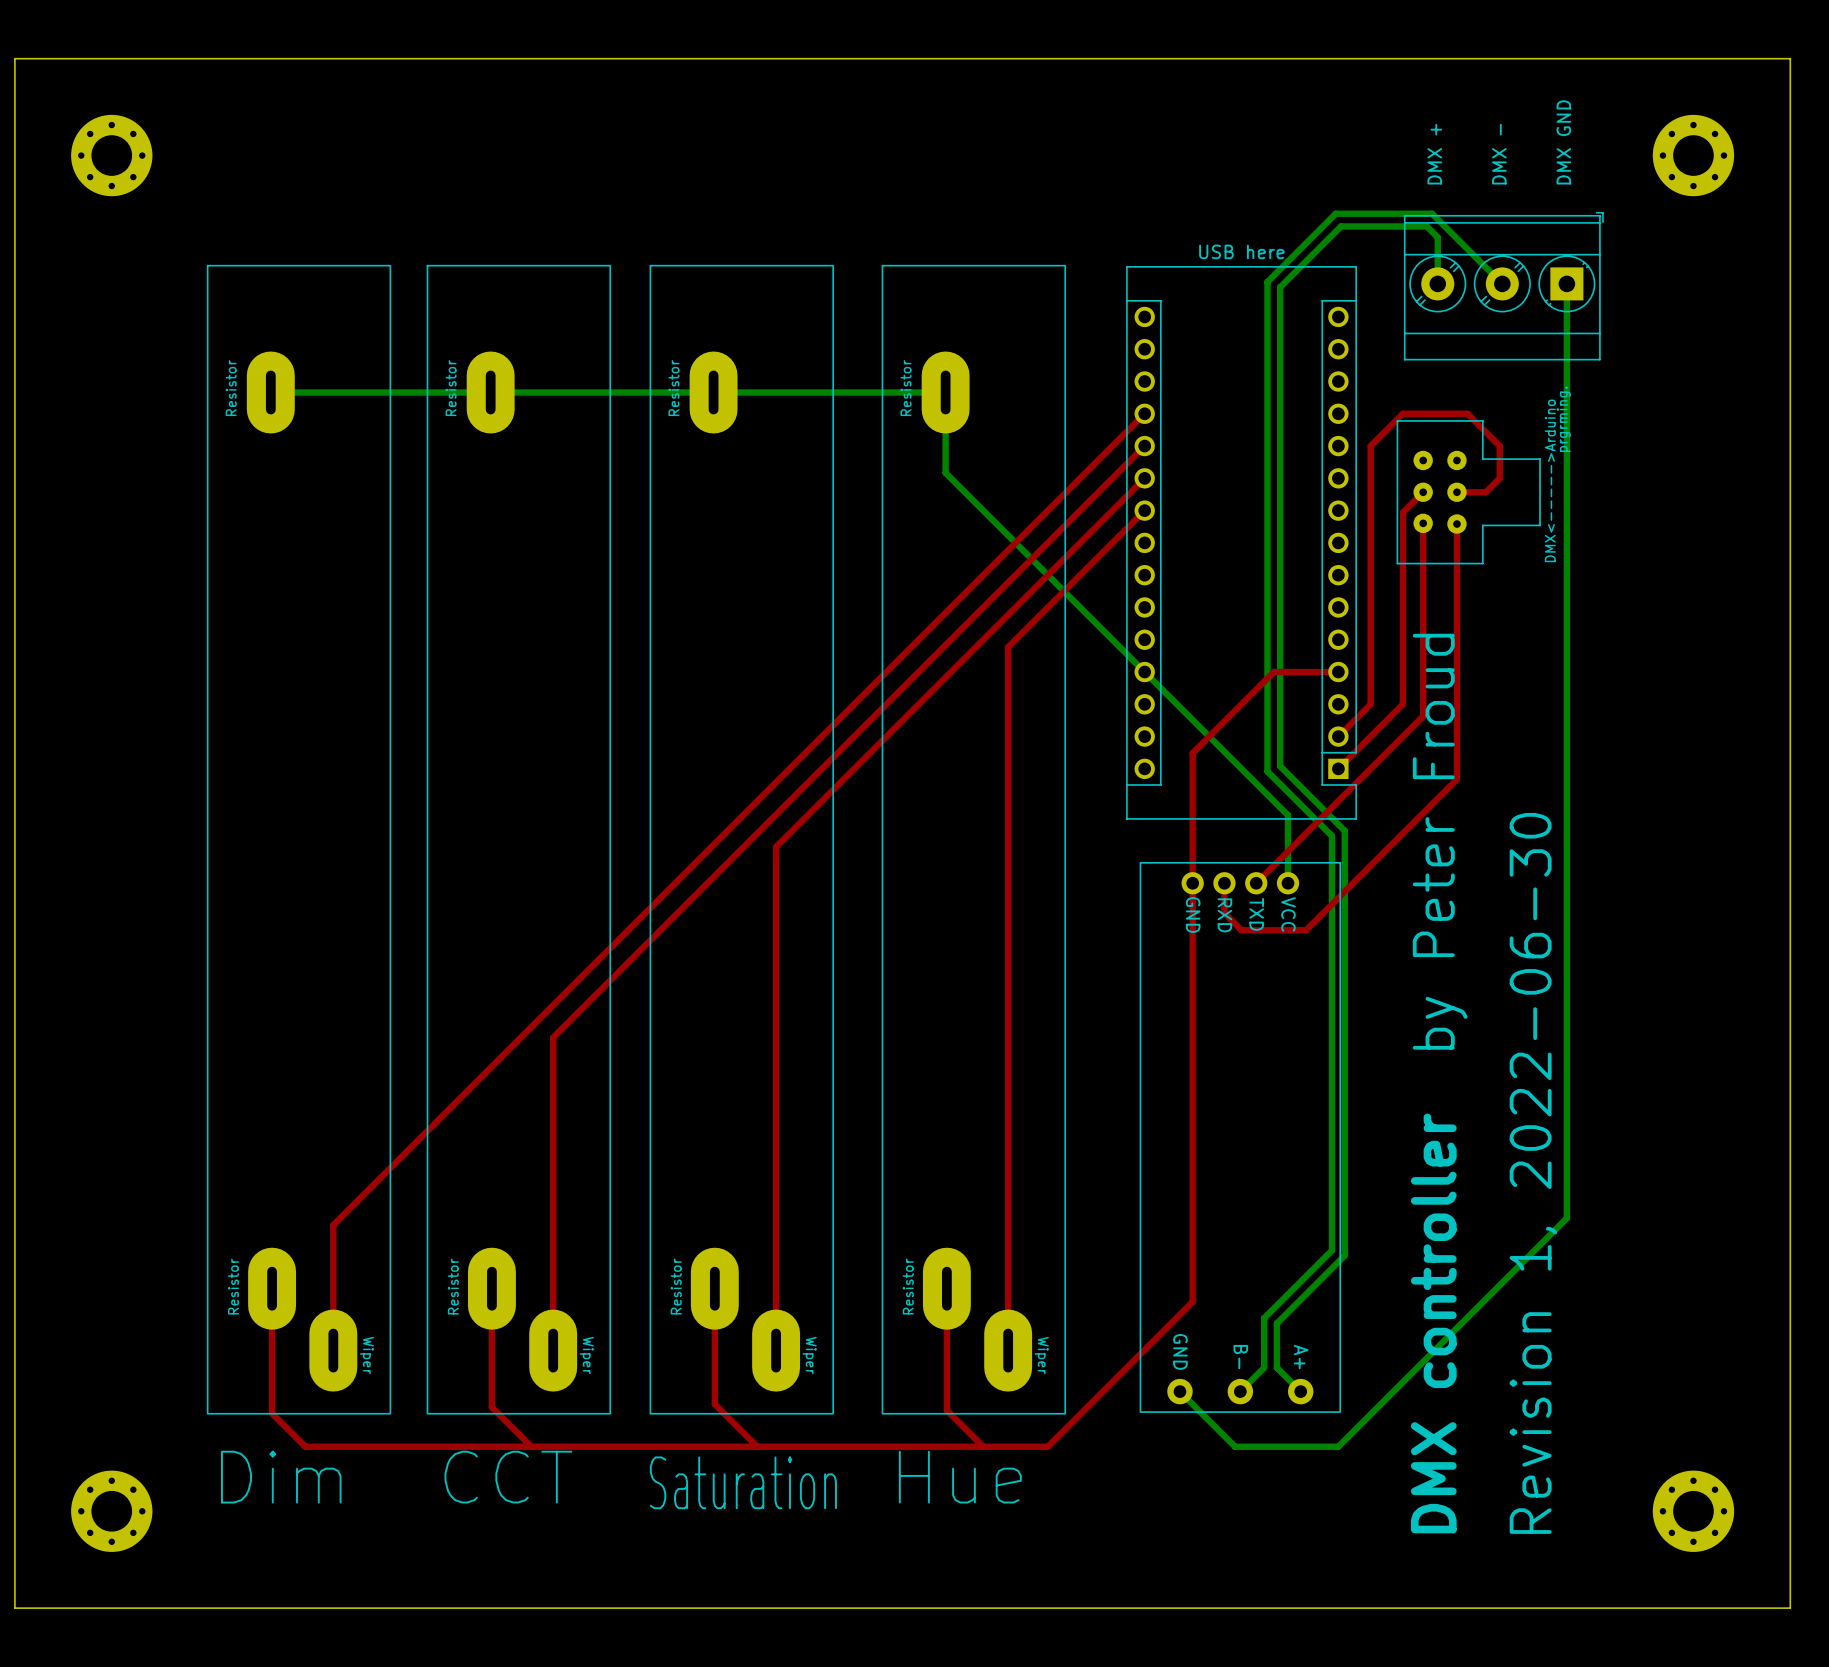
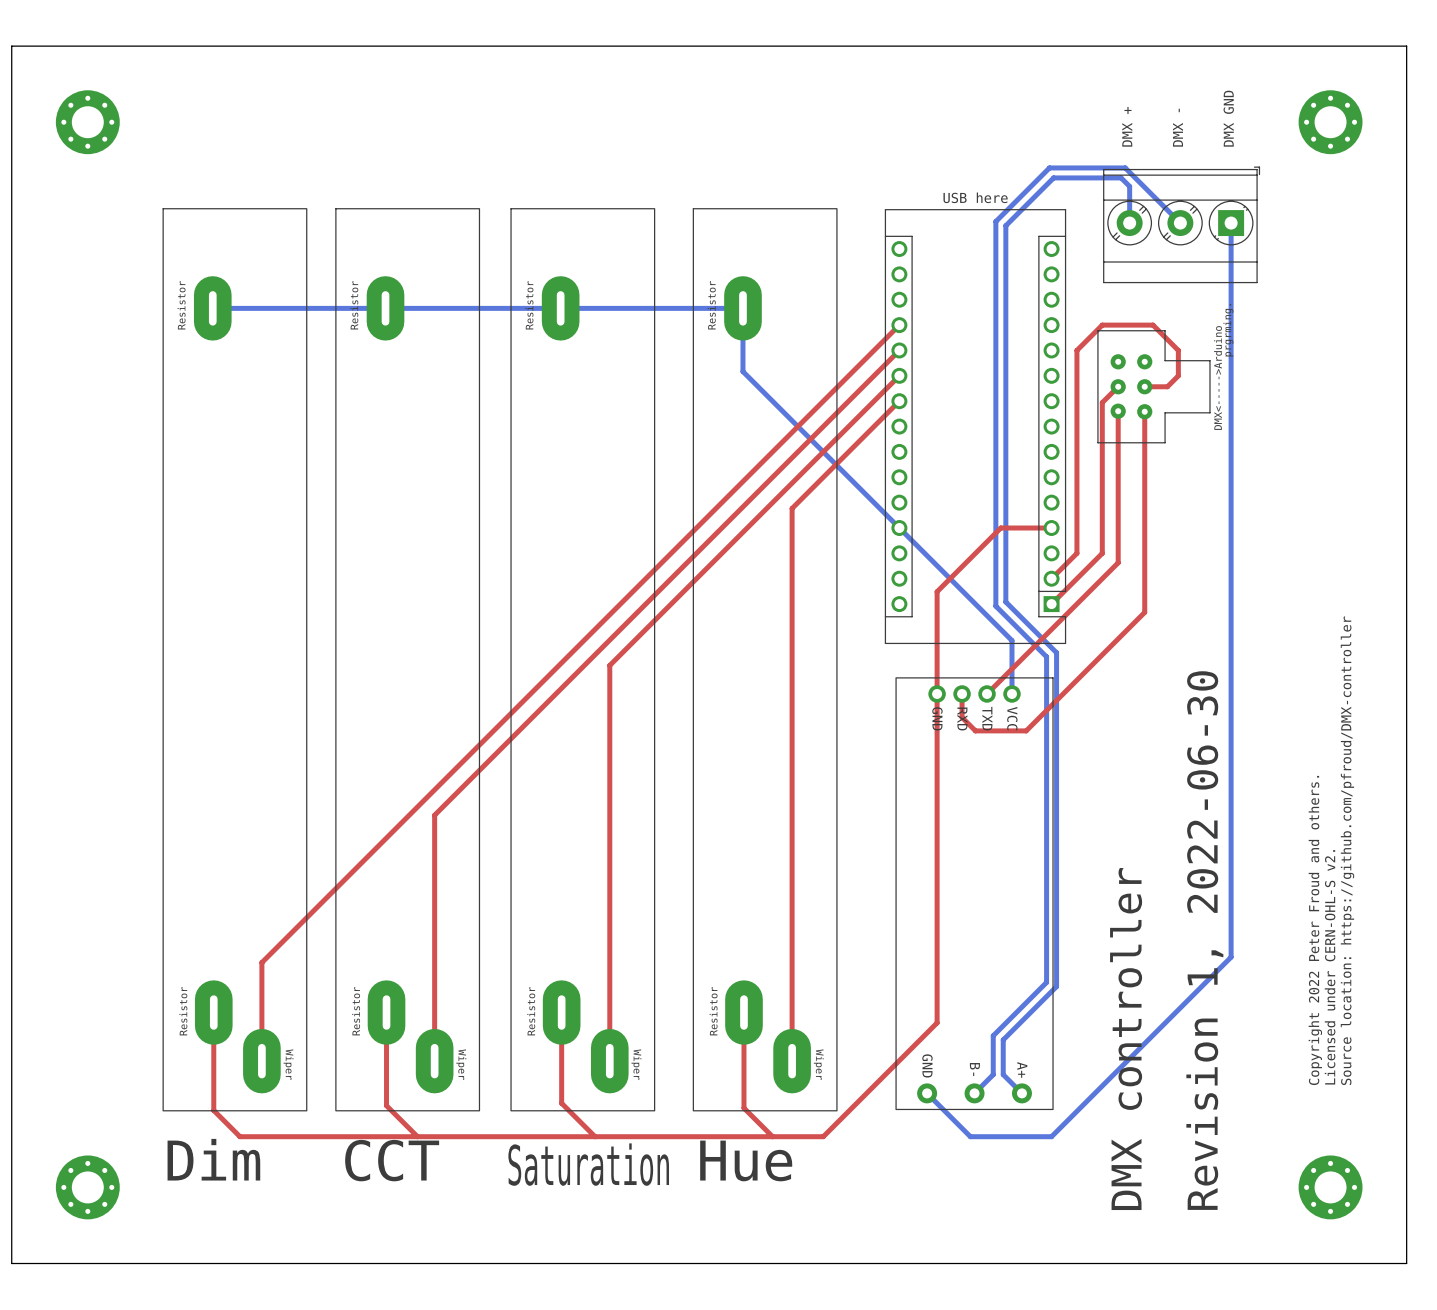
text: by Peter Froud (1440, 841) -> none
text: none -> Source location: https://github.com/pfroud/DMX-controller (1347, 850)
text: none -> Copyright 2022 Peter Froud and others. (1315, 930)
text: none -> Licensed under CERN-OHL-S v2. (1330, 967)

